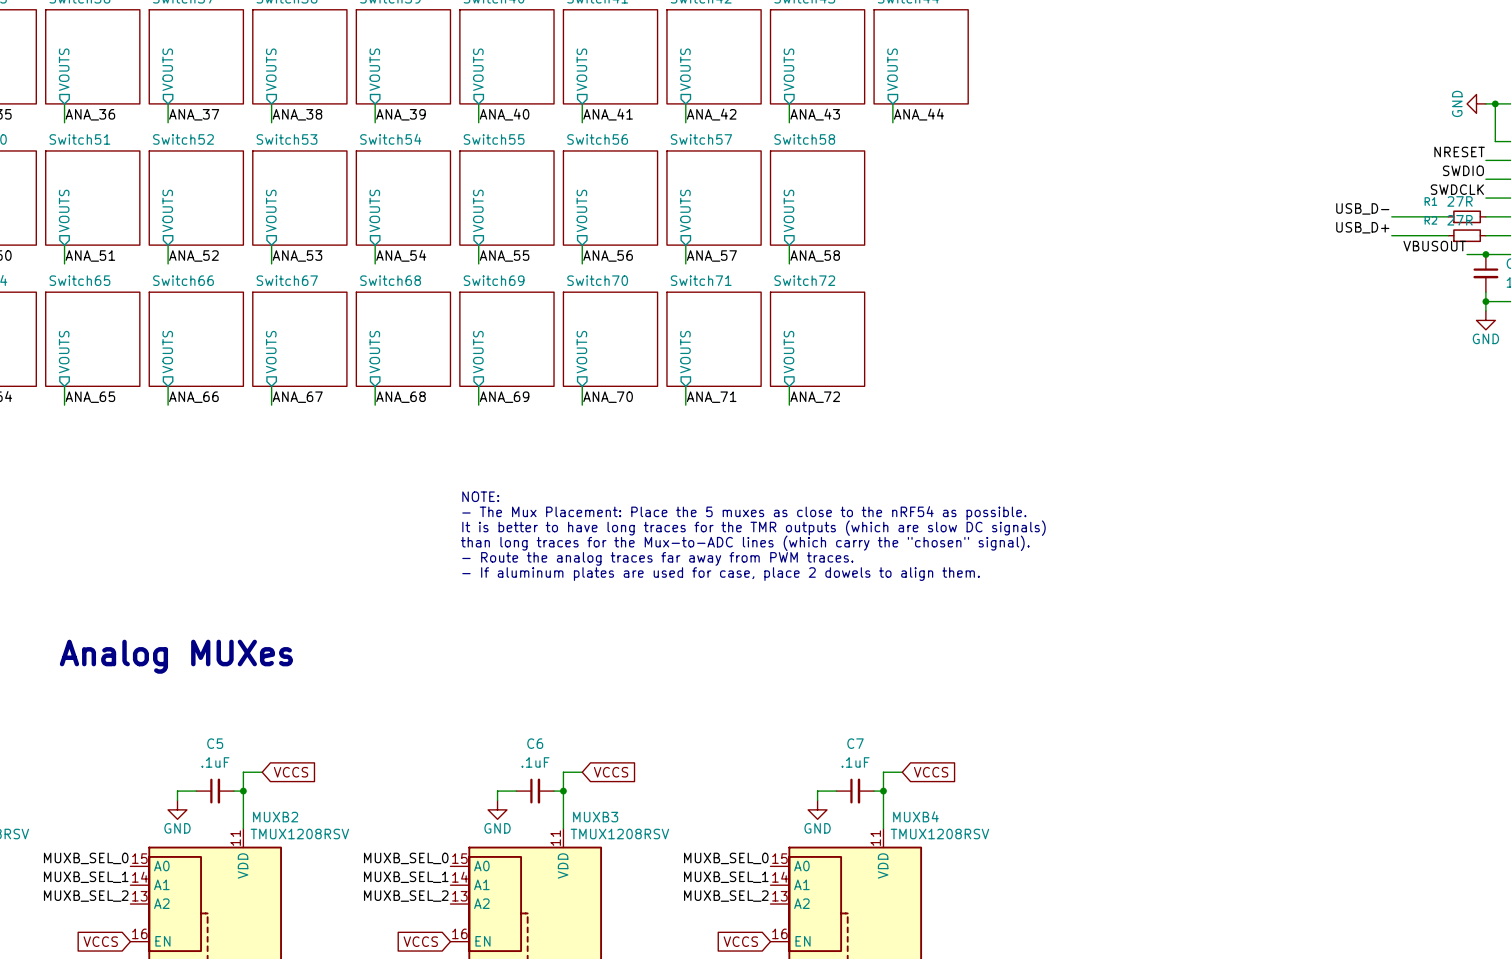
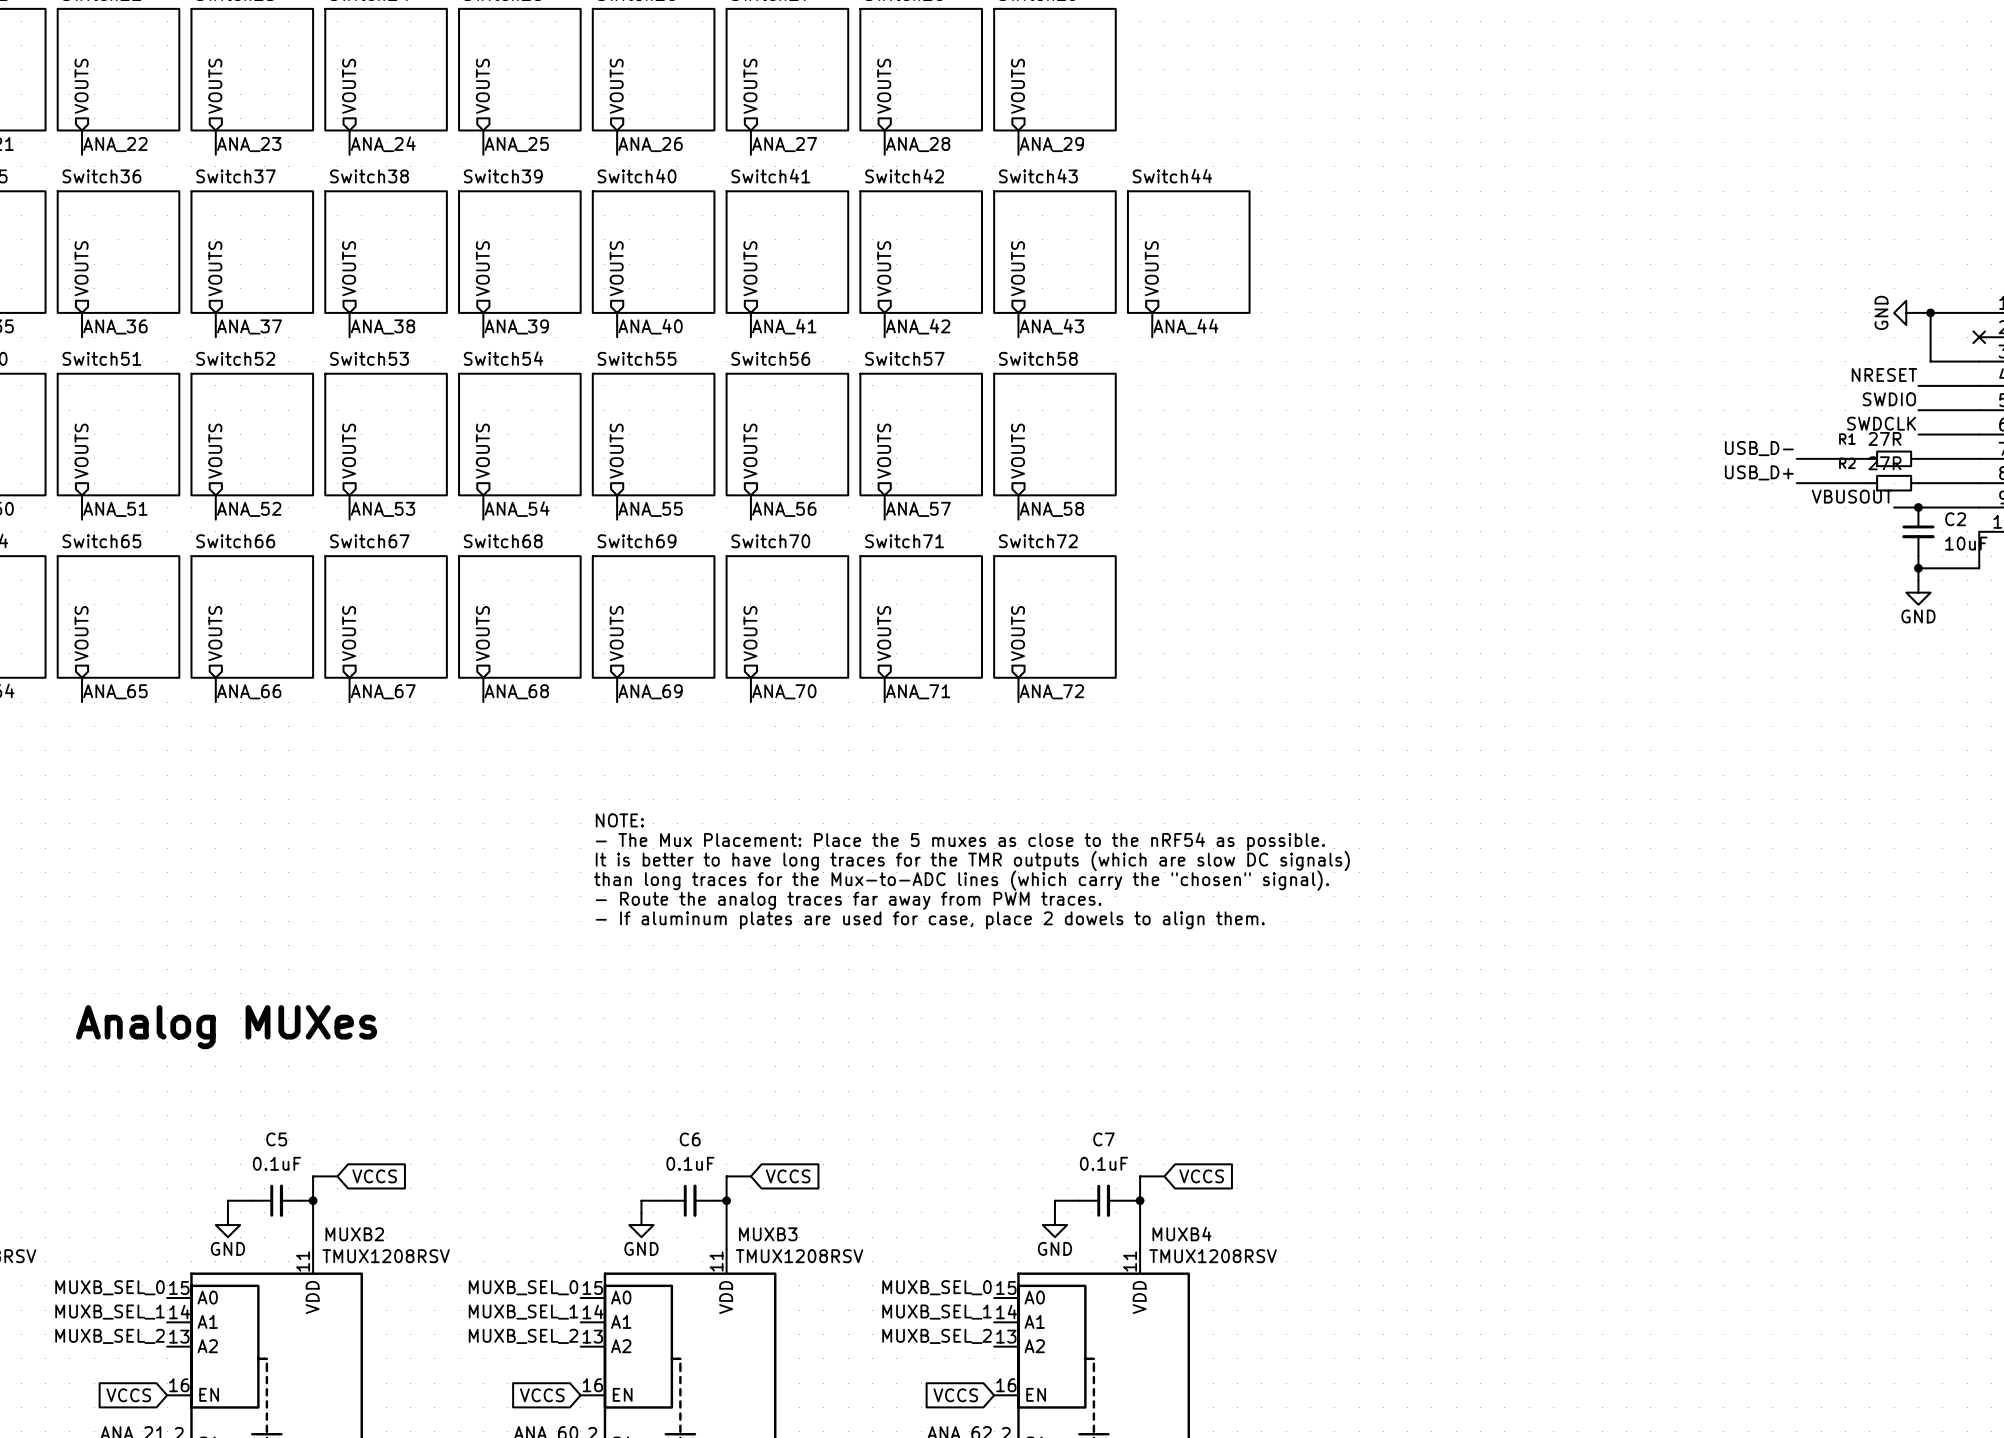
C5 value: .1uF (215, 762) -> 0.1uF (276, 1163)
C6 value: .1uF (535, 762) -> 0.1uF (690, 1163)
C7 value: .1uF (855, 762) -> 0.1uF (1103, 1163)

